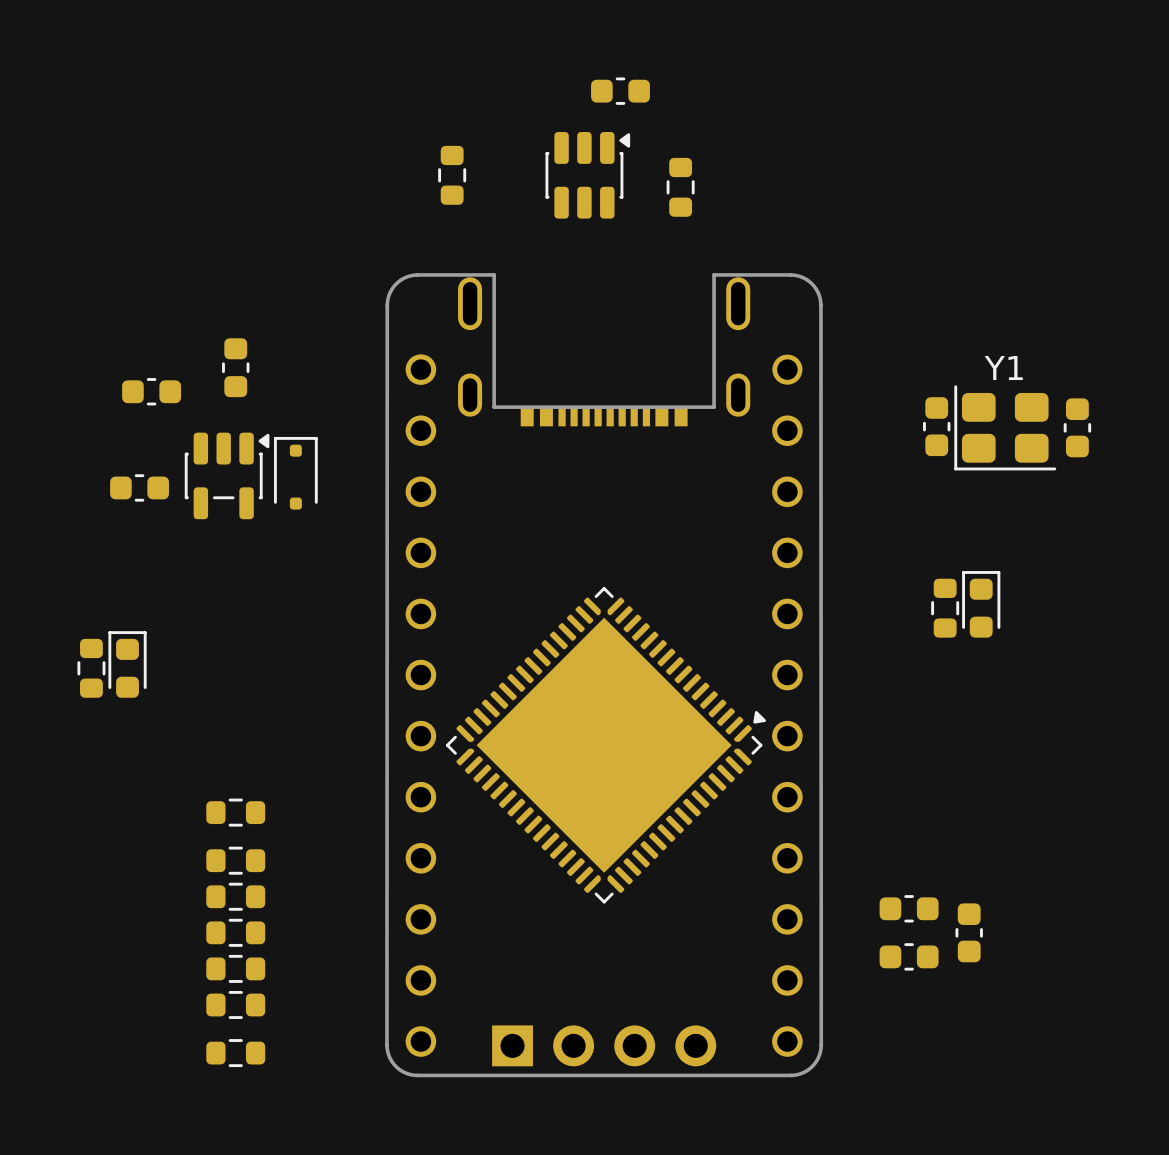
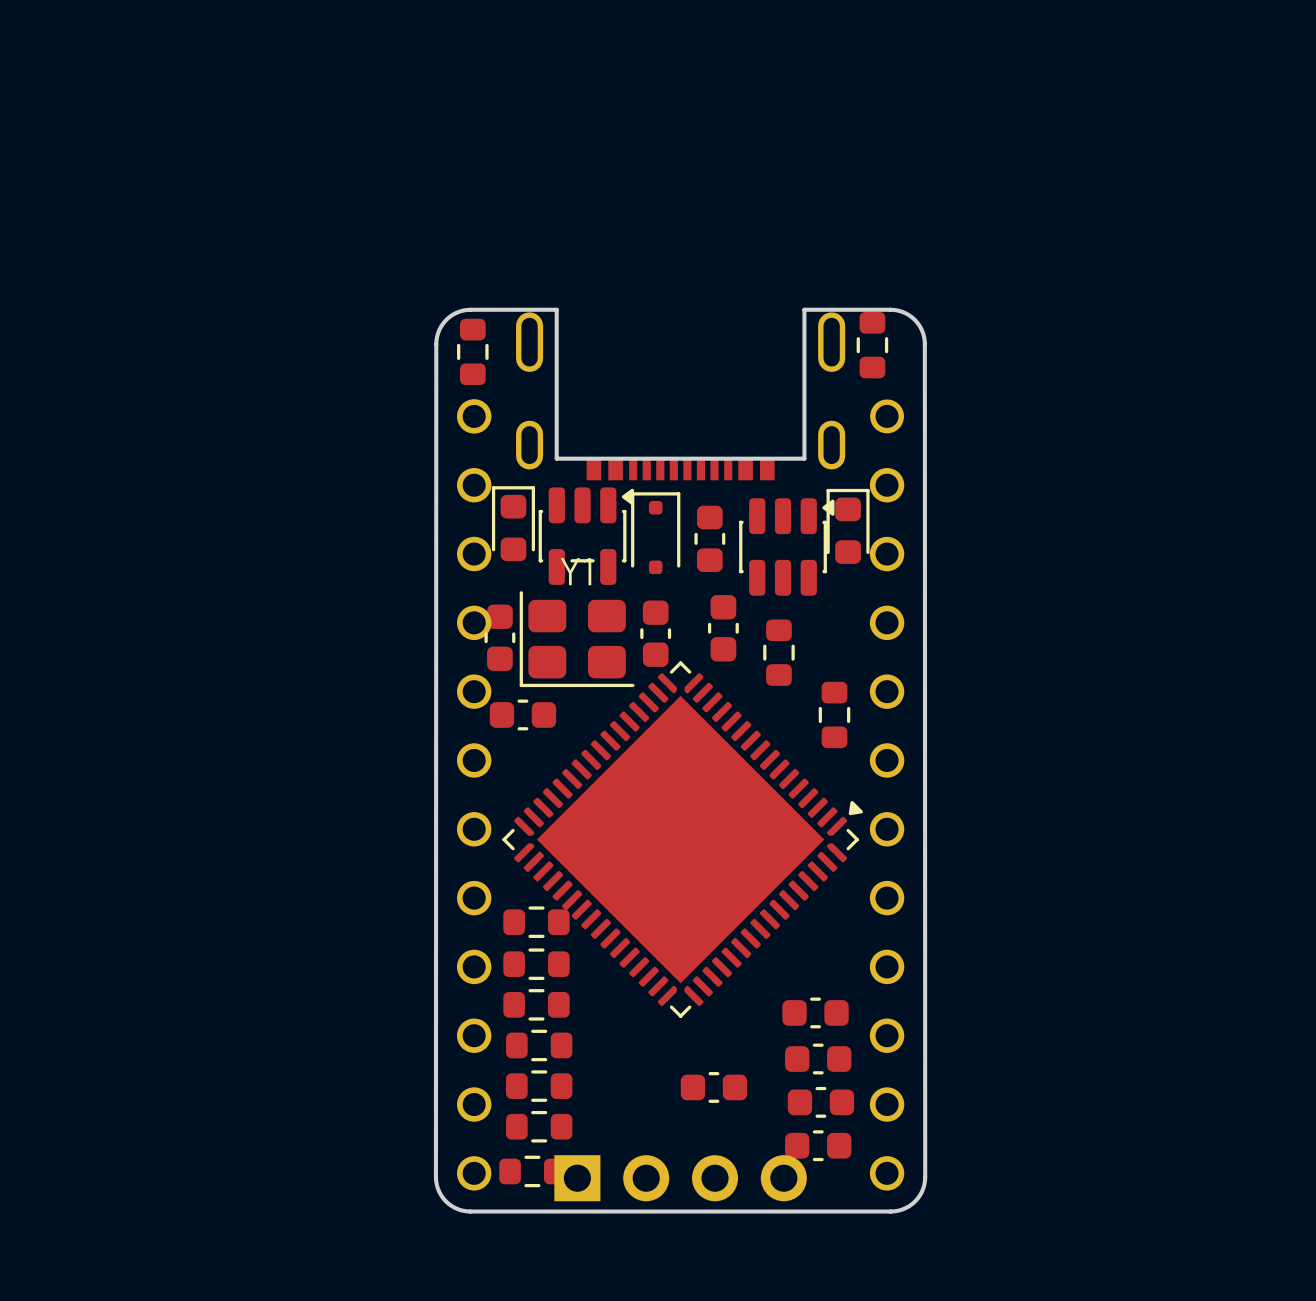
part: (620, 91) -> none
part position: (452, 175) -> (472, 351)
part position: (587, 175) -> (786, 546)
part: (680, 187) -> none
part: none -> (872, 345)
part position: (235, 367) -> (709, 538)
part: (151, 391) -> none
part: (936, 426) -> none
Y1 position: (1005, 427) -> (577, 639)
part: (1077, 427) -> none
part: none -> (513, 523)
part position: (295, 473) -> (655, 533)
part position: (227, 475) -> (586, 536)
part: (139, 487) -> none
part: none -> (723, 628)
part: none -> (655, 633)
part: none -> (499, 637)
part: none -> (778, 652)
part position: (981, 604) -> (848, 526)
part: (945, 608) -> none
part: none -> (522, 714)
part: none -> (834, 714)
part: (127, 664) -> none
part: (91, 668) -> none
part: (235, 812) -> none
part: none -> (536, 922)
part: none -> (536, 964)
part: (235, 860) -> none
part: none -> (536, 1004)
part: (235, 896) -> none
part: none -> (815, 1012)
part: (909, 908) -> none
part: none -> (539, 1045)
part: (235, 932) -> none
part: (969, 932) -> none
part: none -> (818, 1059)
part: (909, 956) -> none
part: none -> (539, 1086)
part: none -> (713, 1087)
part: (235, 968) -> none
part: none -> (820, 1102)
part: none -> (539, 1126)
part: (235, 1004) -> none
part: none -> (818, 1145)
part: none -> (532, 1171)
part: (235, 1053) -> none

